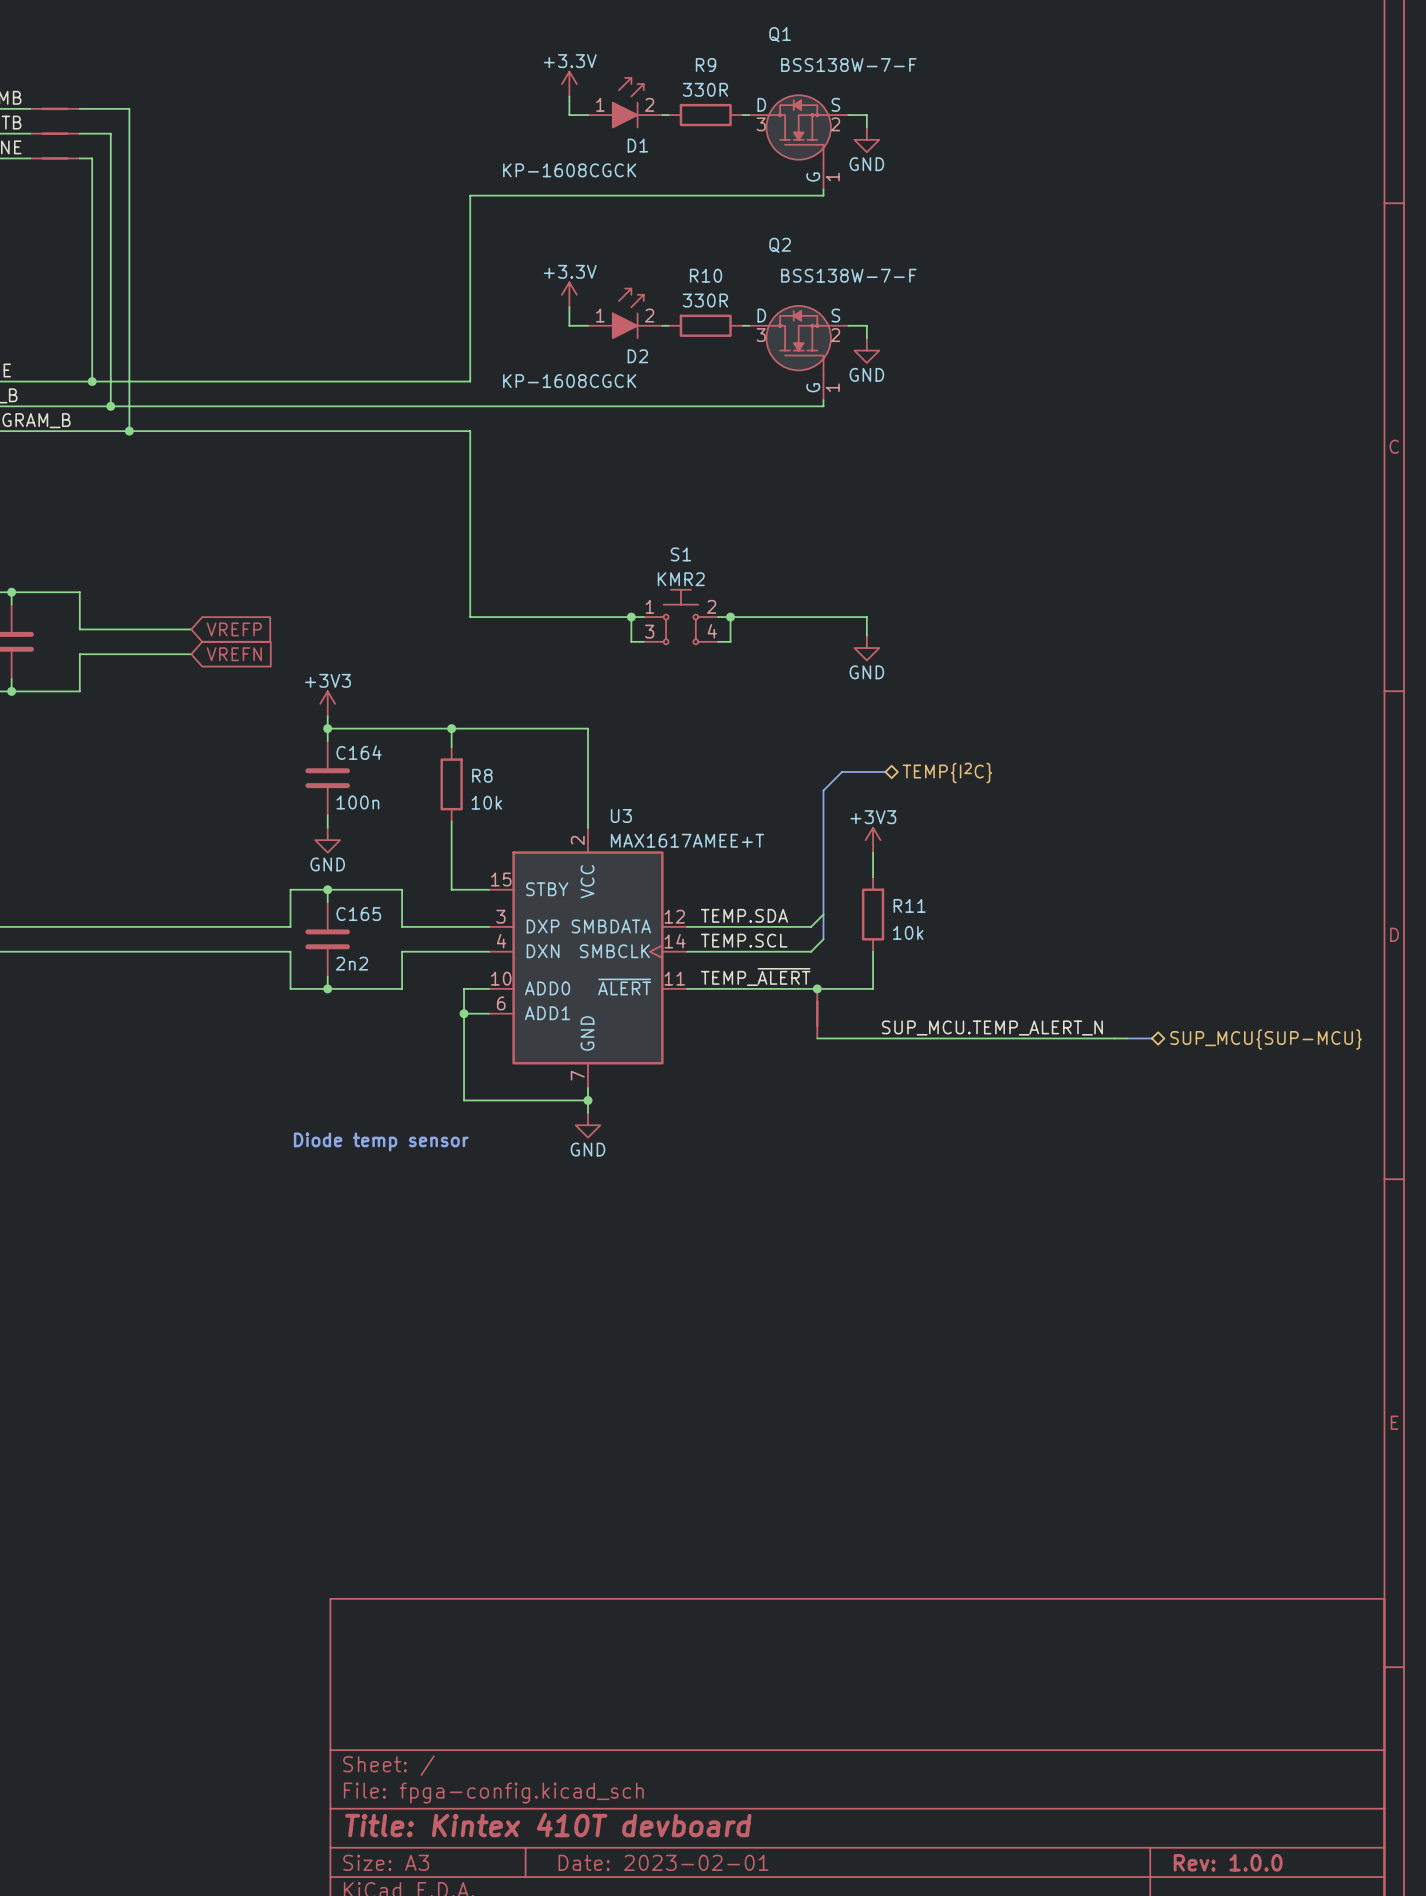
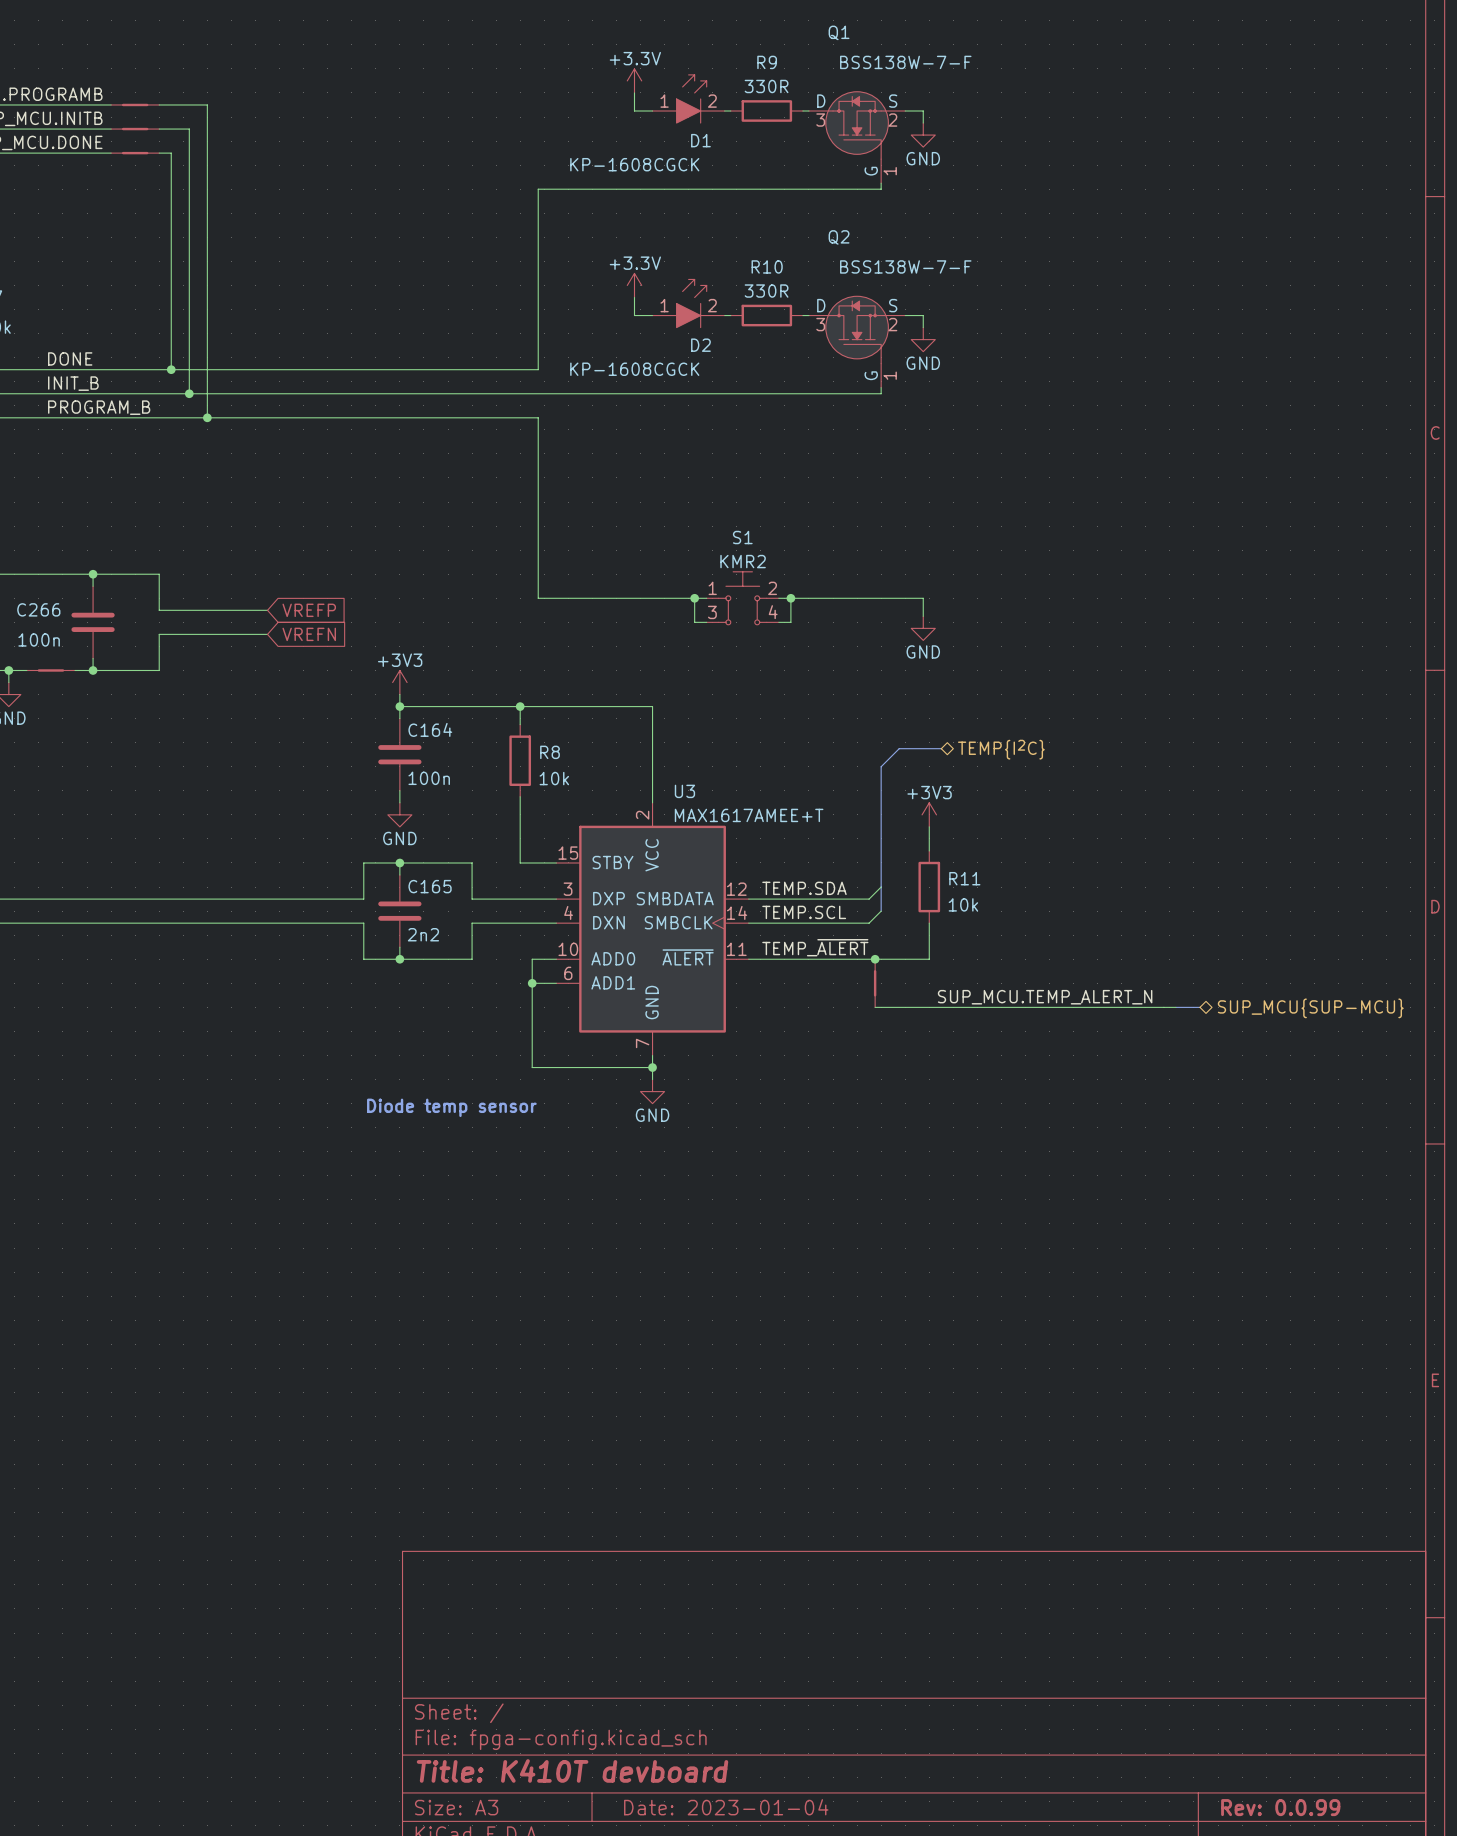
title block: Title: Kintex 410T devboard (548, 1825) -> Title: K410T devboard (572, 1770)
title block: Date: 2023-02-01 (663, 1862) -> Date: 2023-01-04 (726, 1807)
title block: Rev: 1.0.0 (1228, 1862) -> Rev: 0.0.99 (1280, 1807)

